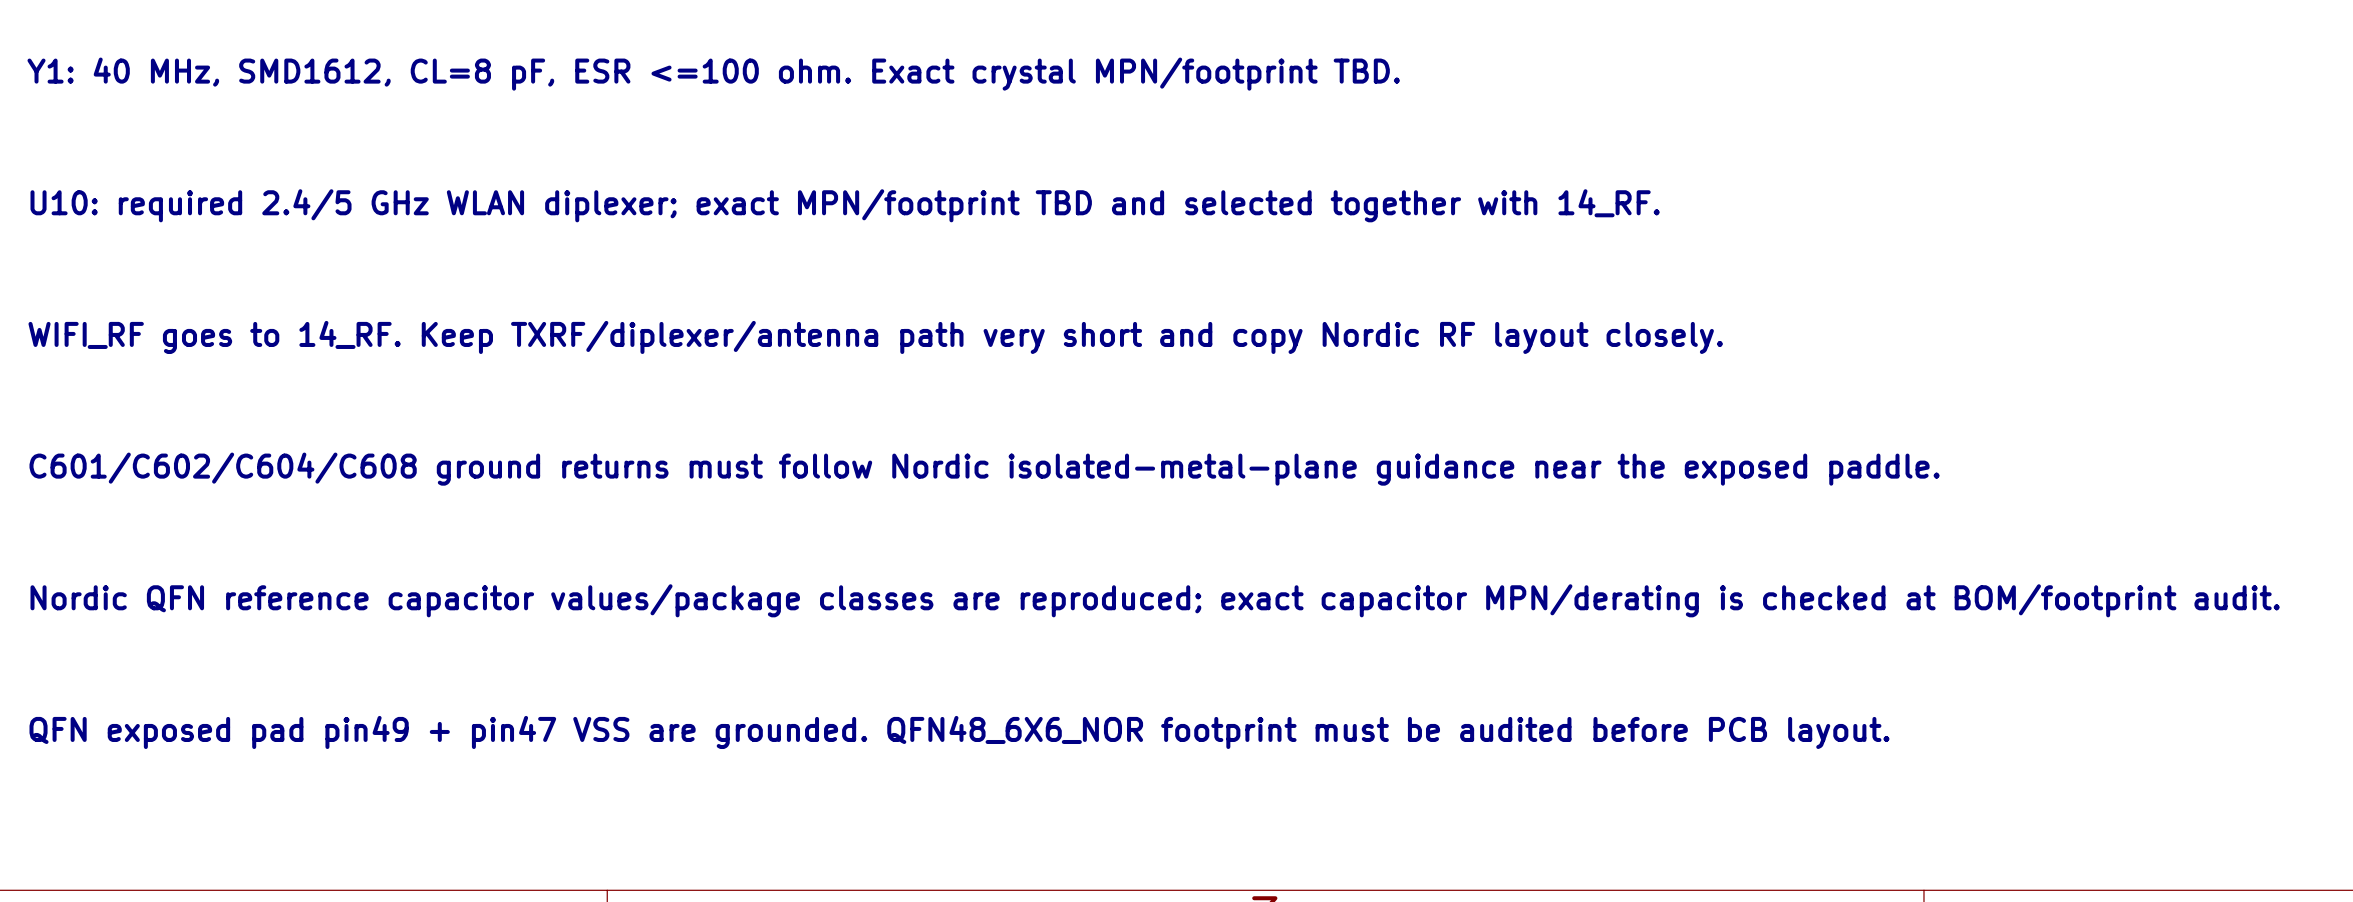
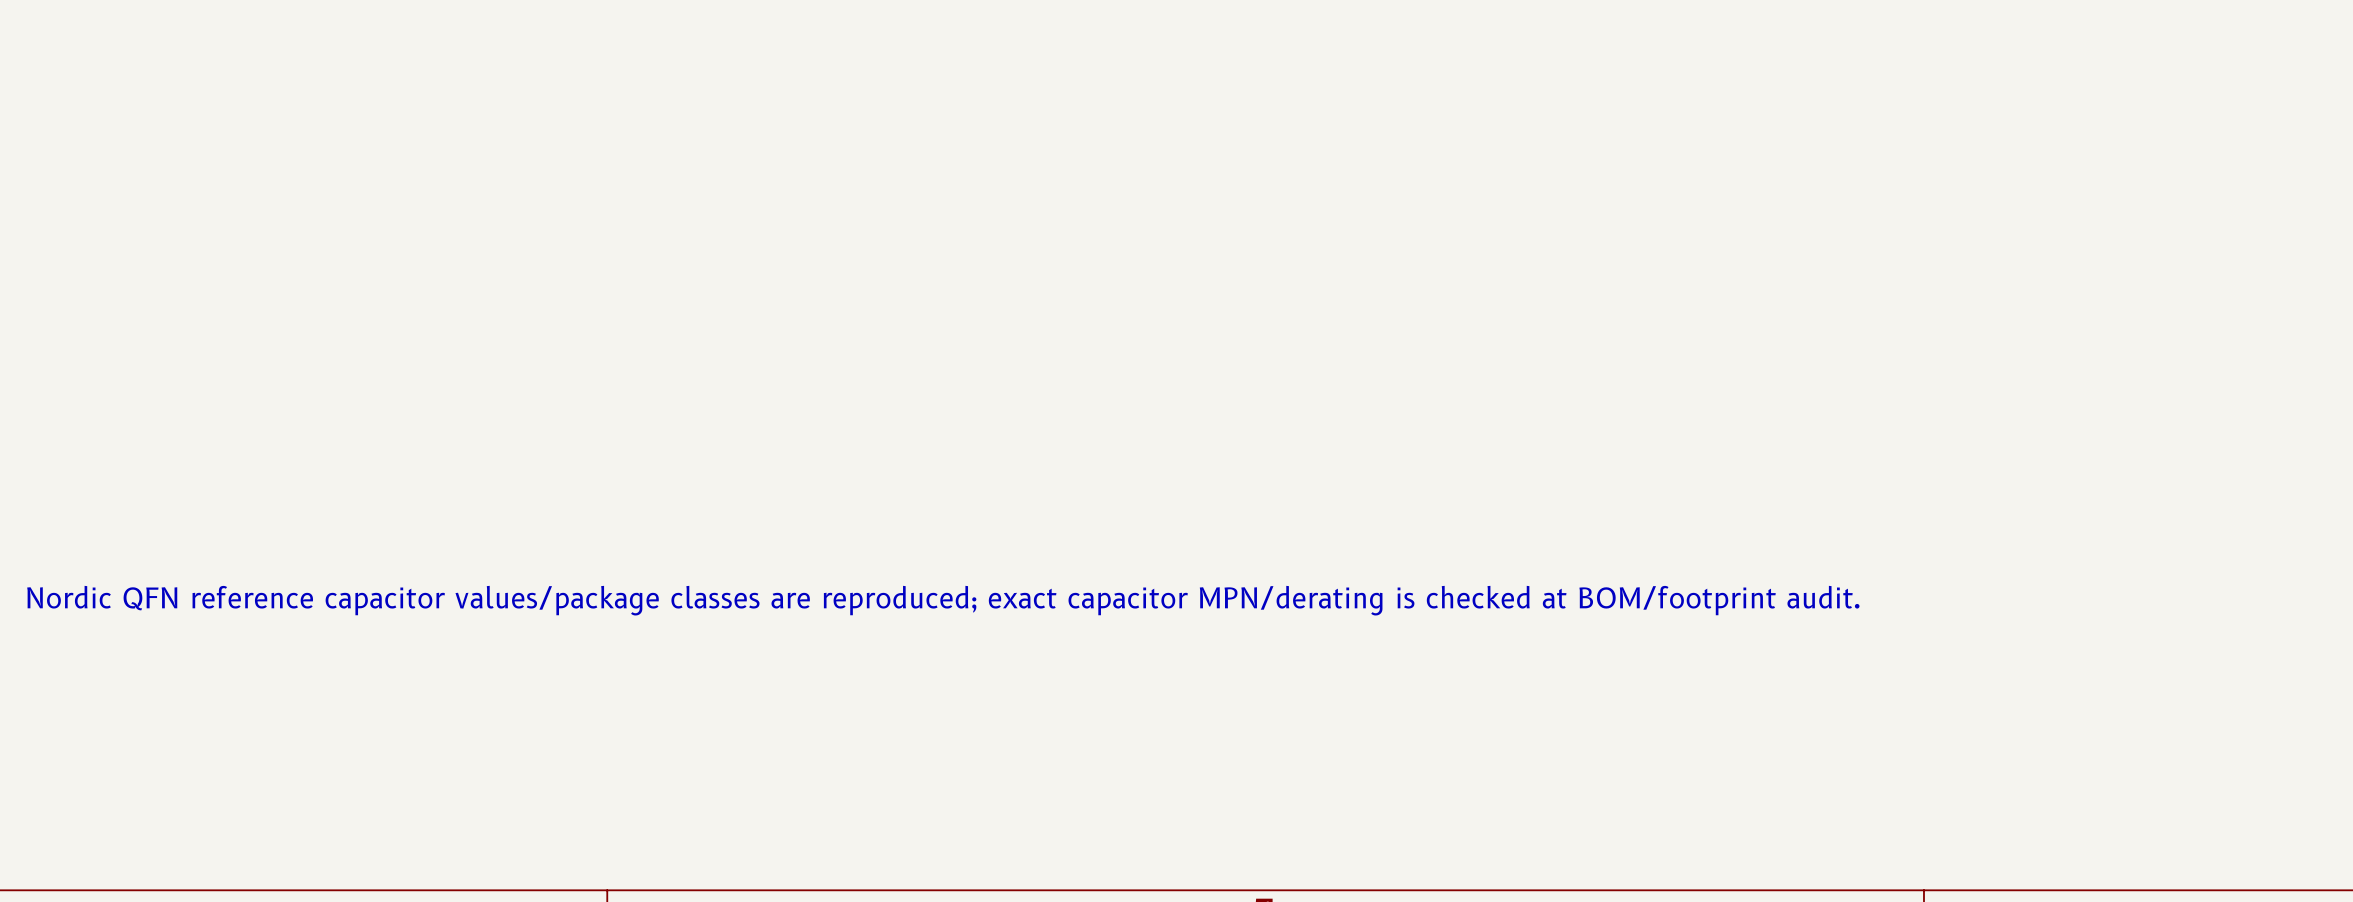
text: Y1: 40 MHz, SMD1612, CL=8 pF, ESR <=100 ohm. Exact crystal MPN/footprint TBD. (713, 74) -> none
text: U10: required 2.4/5 GHz WLAN diplexer; exact MPN/footprint TBD and selected together with 14_RF. (845, 205) -> none
text: WIFI_RF goes to 14_RF. Keep TXRF/diplexer/antenna path very short and copy Nordic RF layout closely. (875, 337) -> none
text: C601/C602/C604/C608 ground returns must follow Nordic isolated-metal-plane guidance near the exposed paddle. (984, 469) -> none
text: QFN exposed pad pin49 + pin47 VSS are grounded. QFN48_6X6_NOR footprint must be audited before PCB layout. (959, 732) -> none

